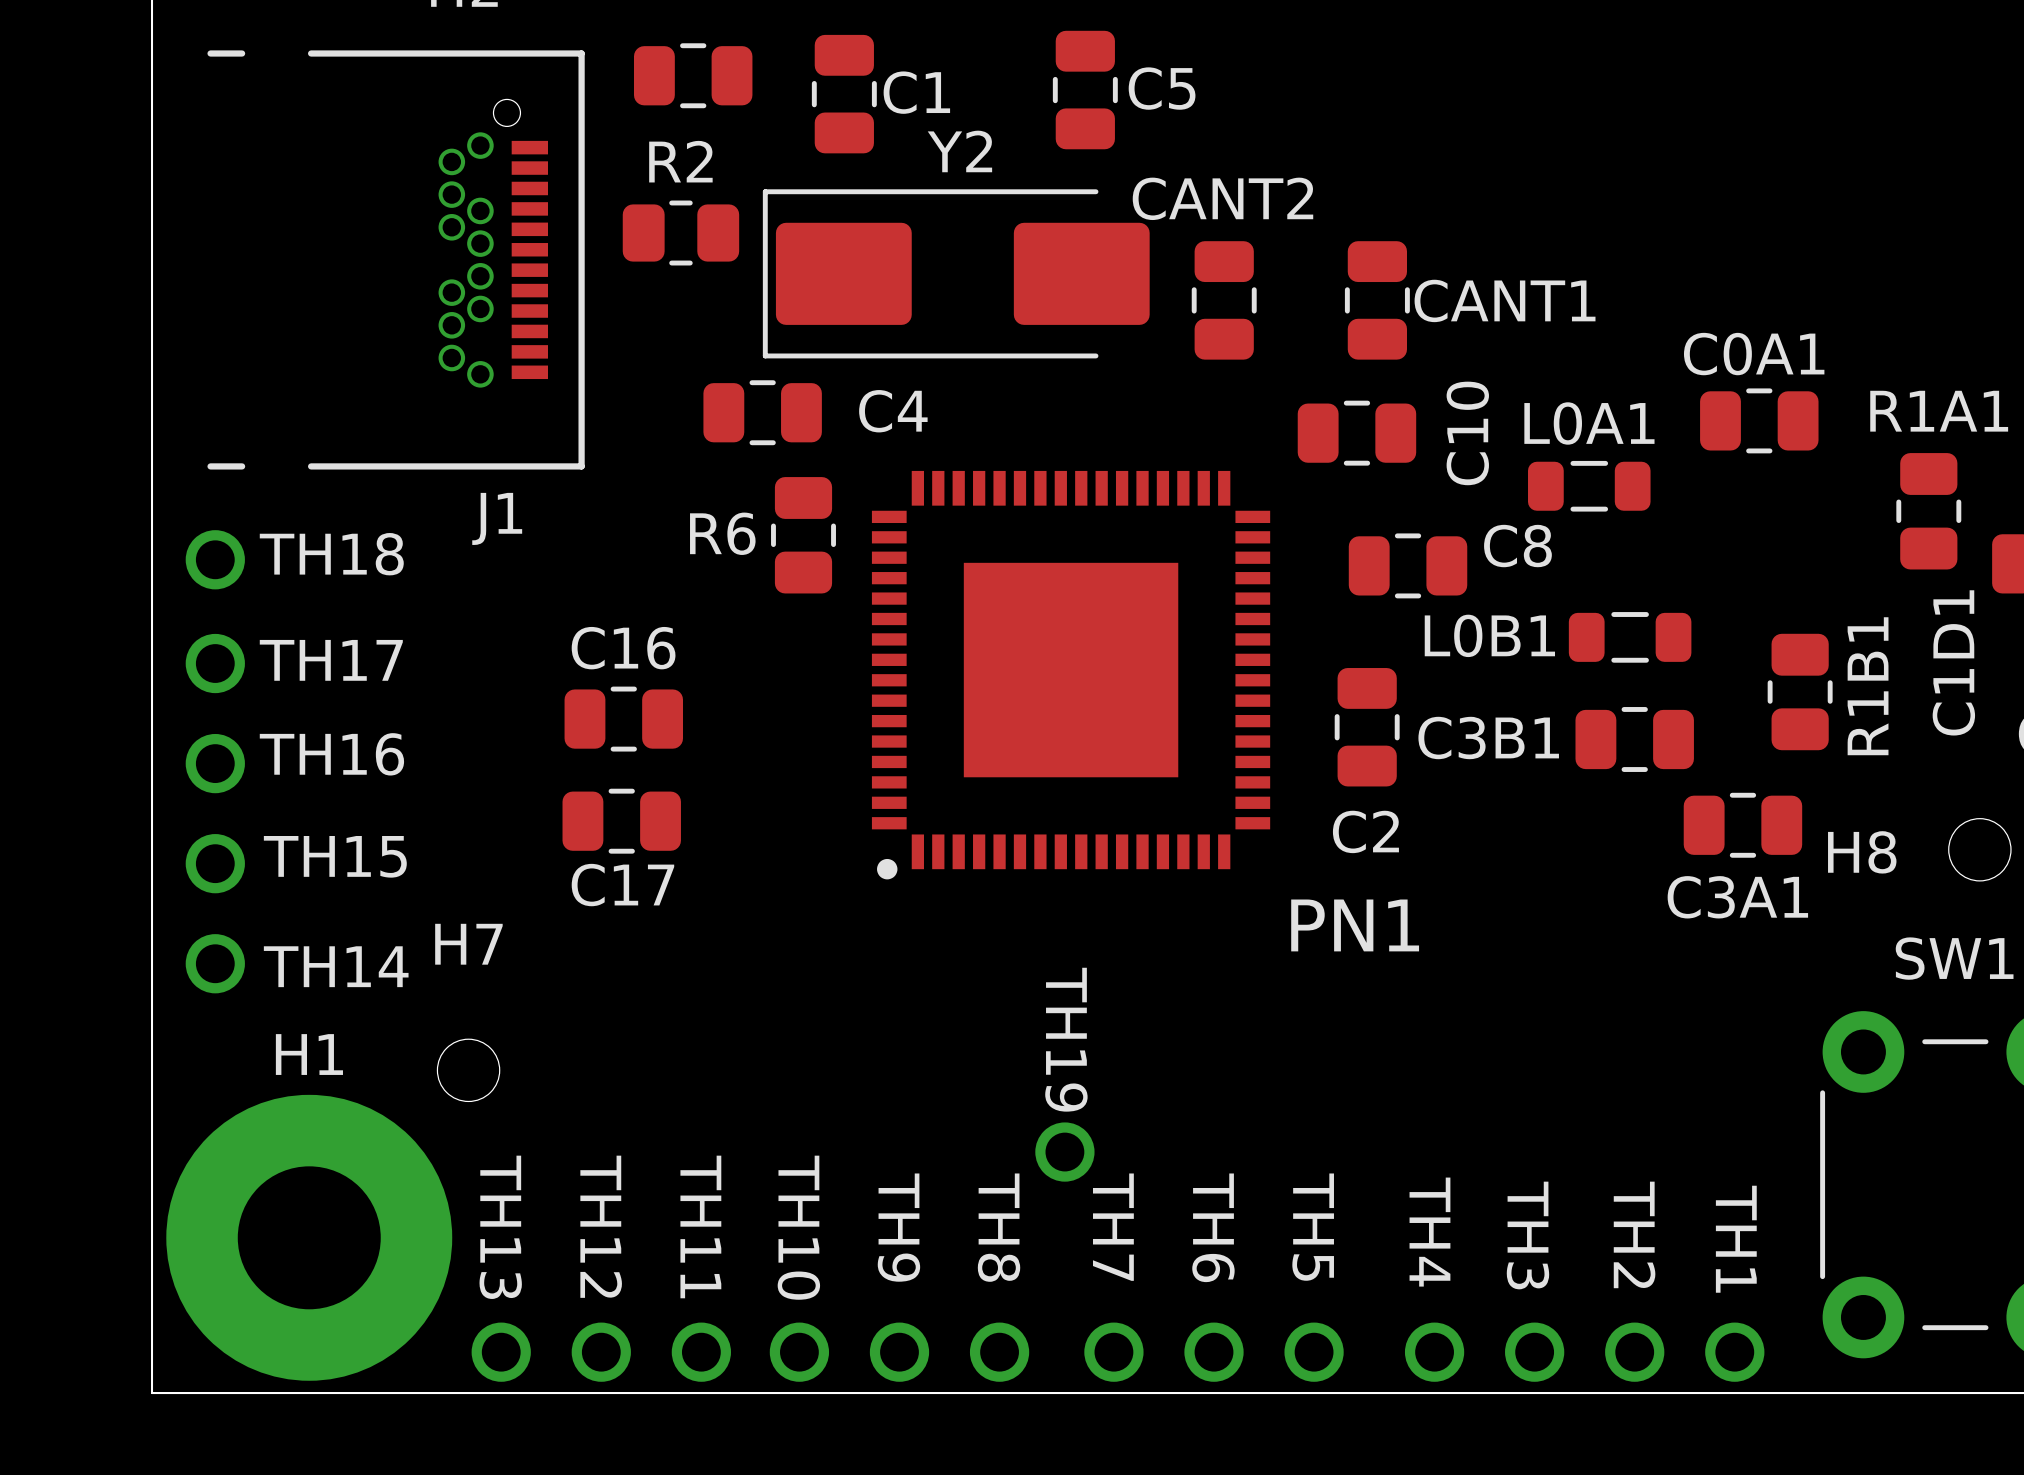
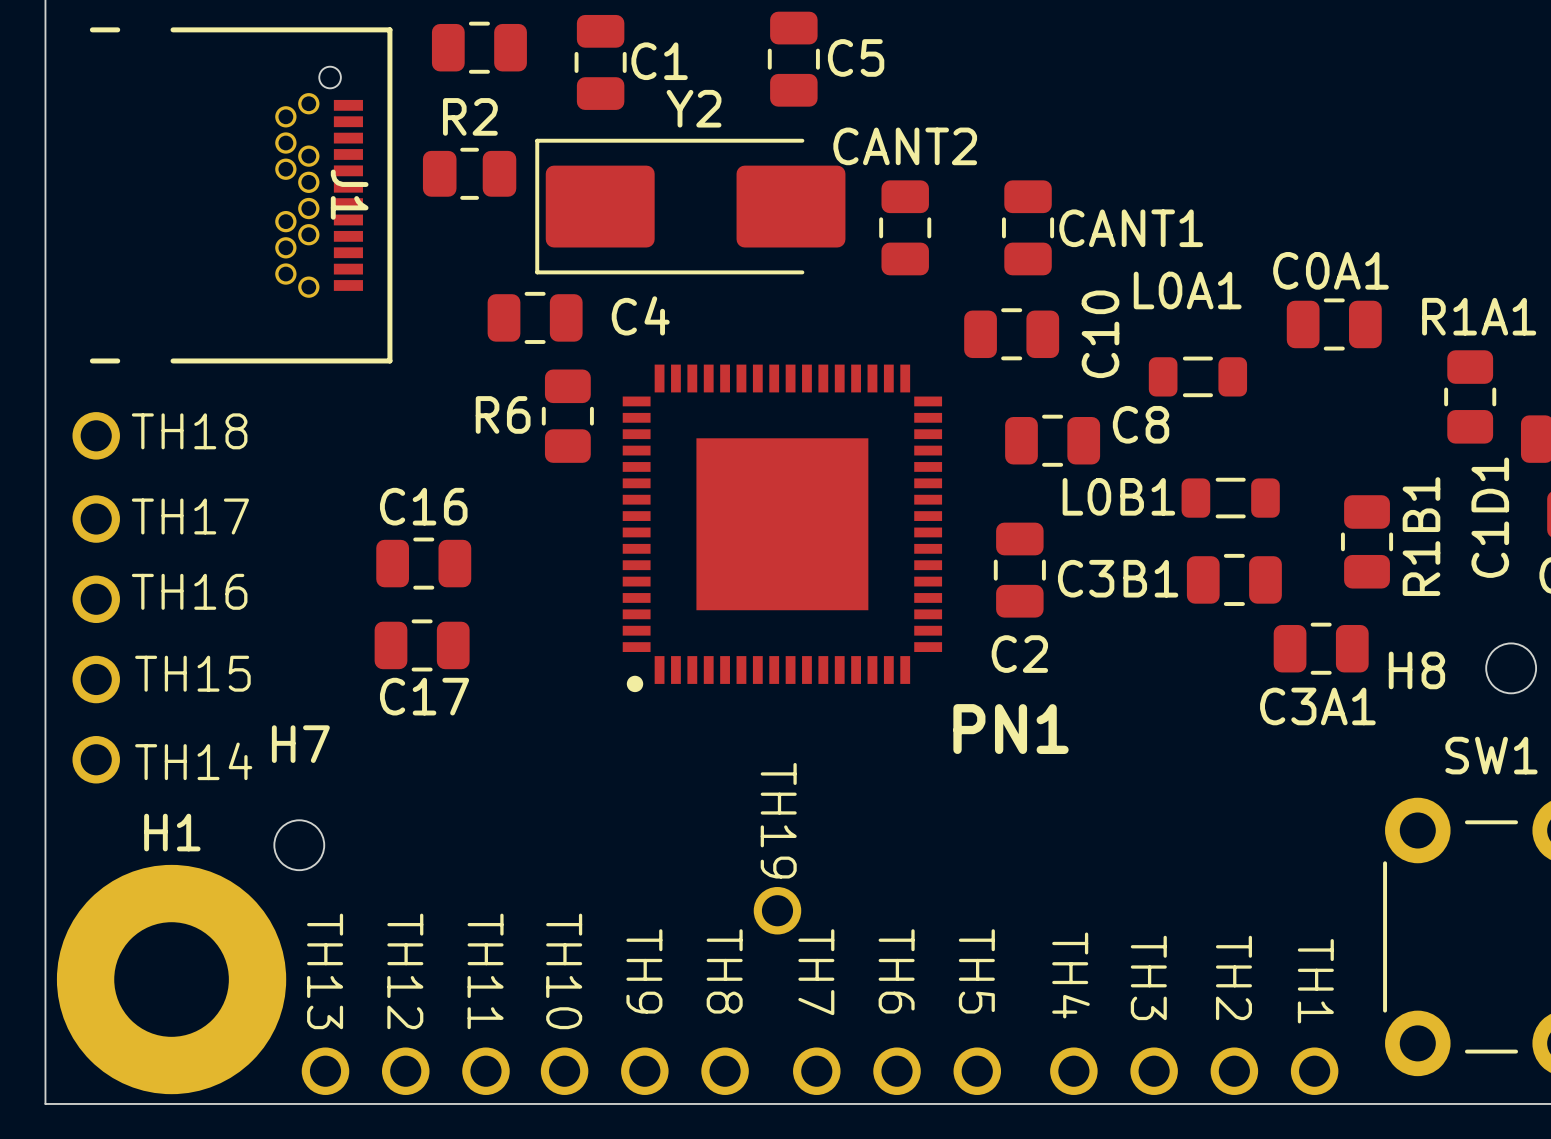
L0A1 name position: L0A1 (1589, 423) -> L0A1 (1187, 290)
J1 name rotation: 0° (497, 518) -> 90° clockwise (349, 194)
J1 name position: J1 (497, 518) -> J1 (349, 194)

